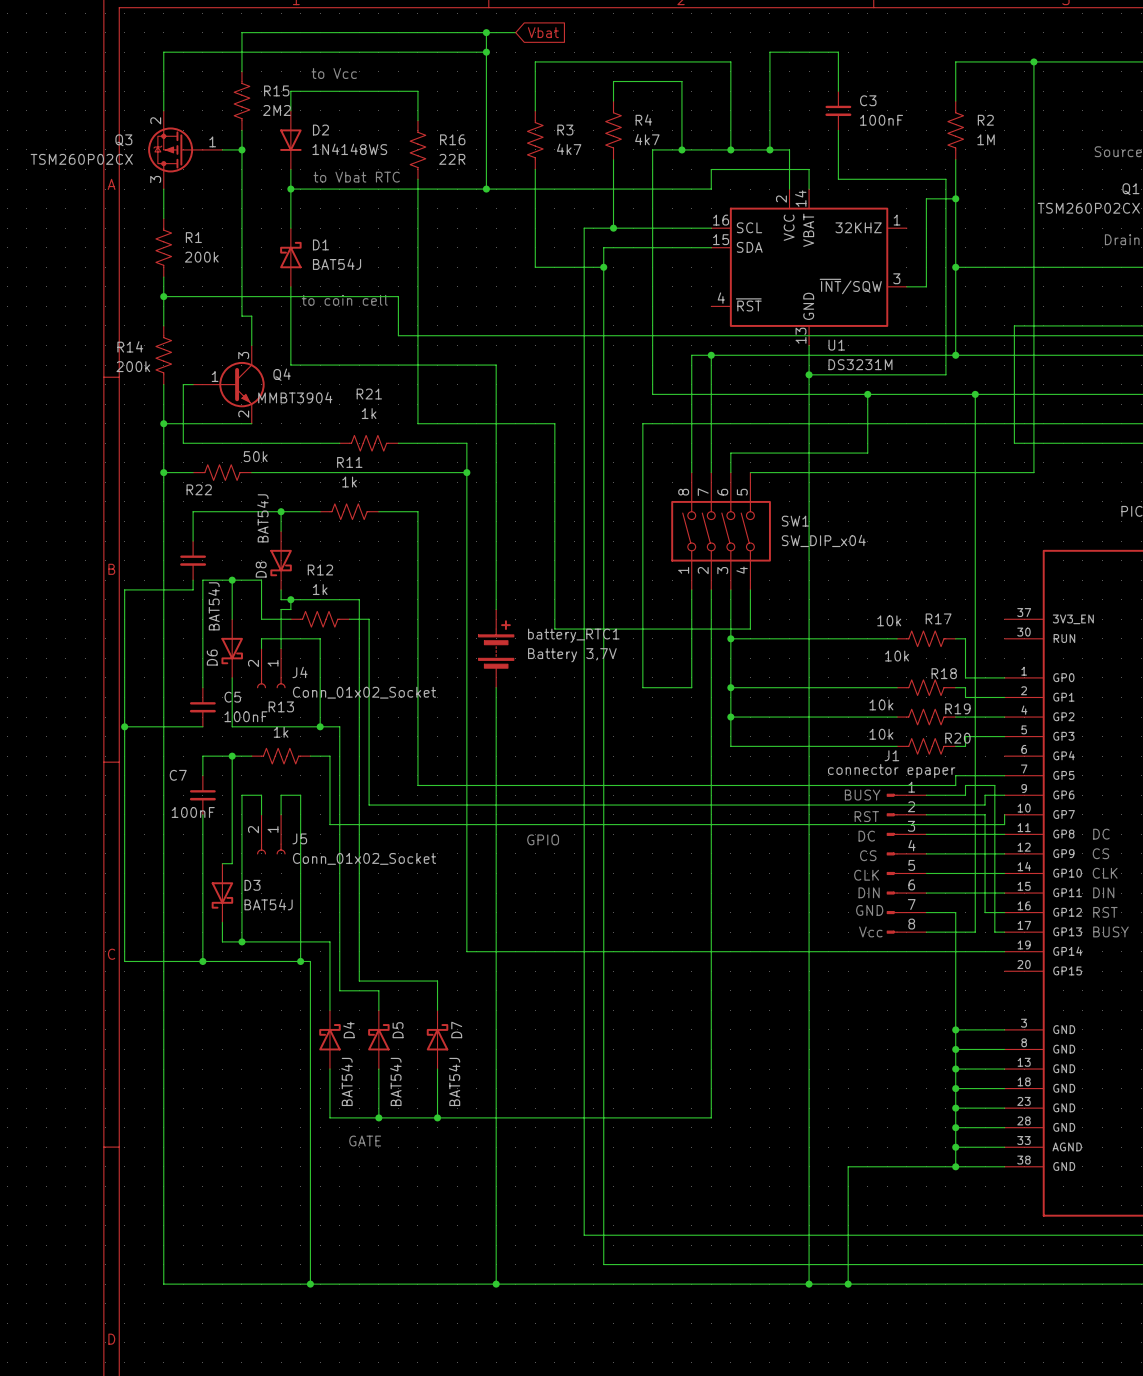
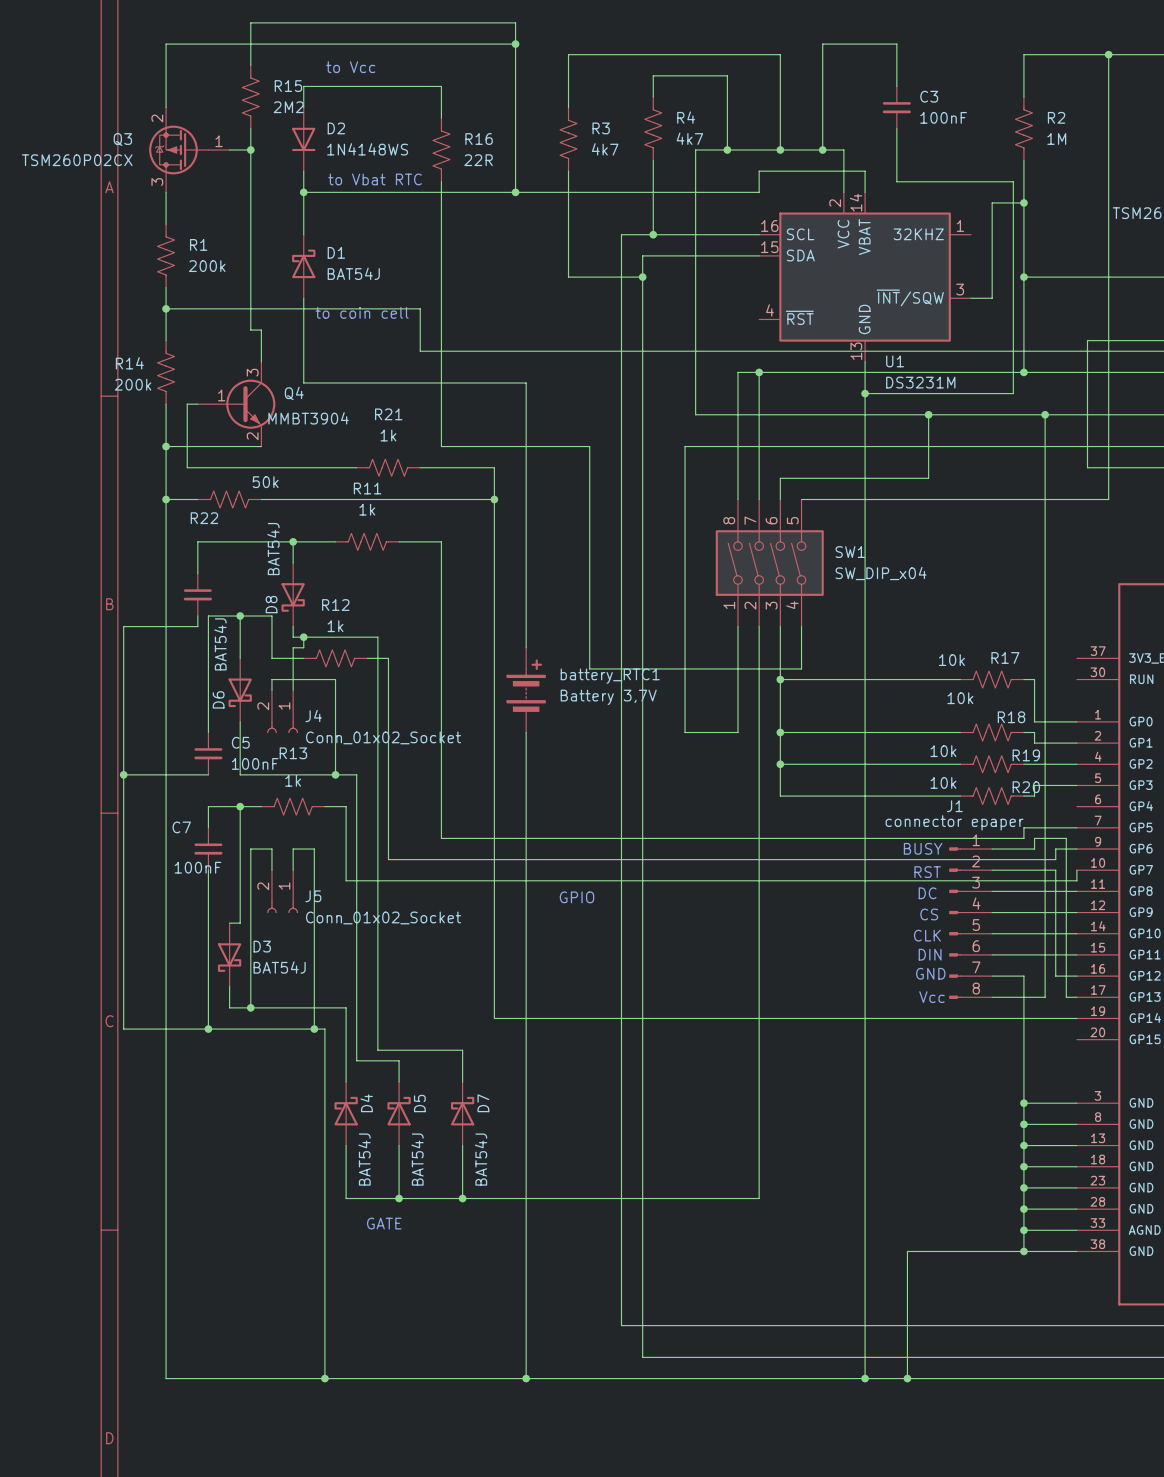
wire: (486, 32) (515, 32) -> none
junction: (486, 32) -> none
global label: Vbat (543, 32) -> none

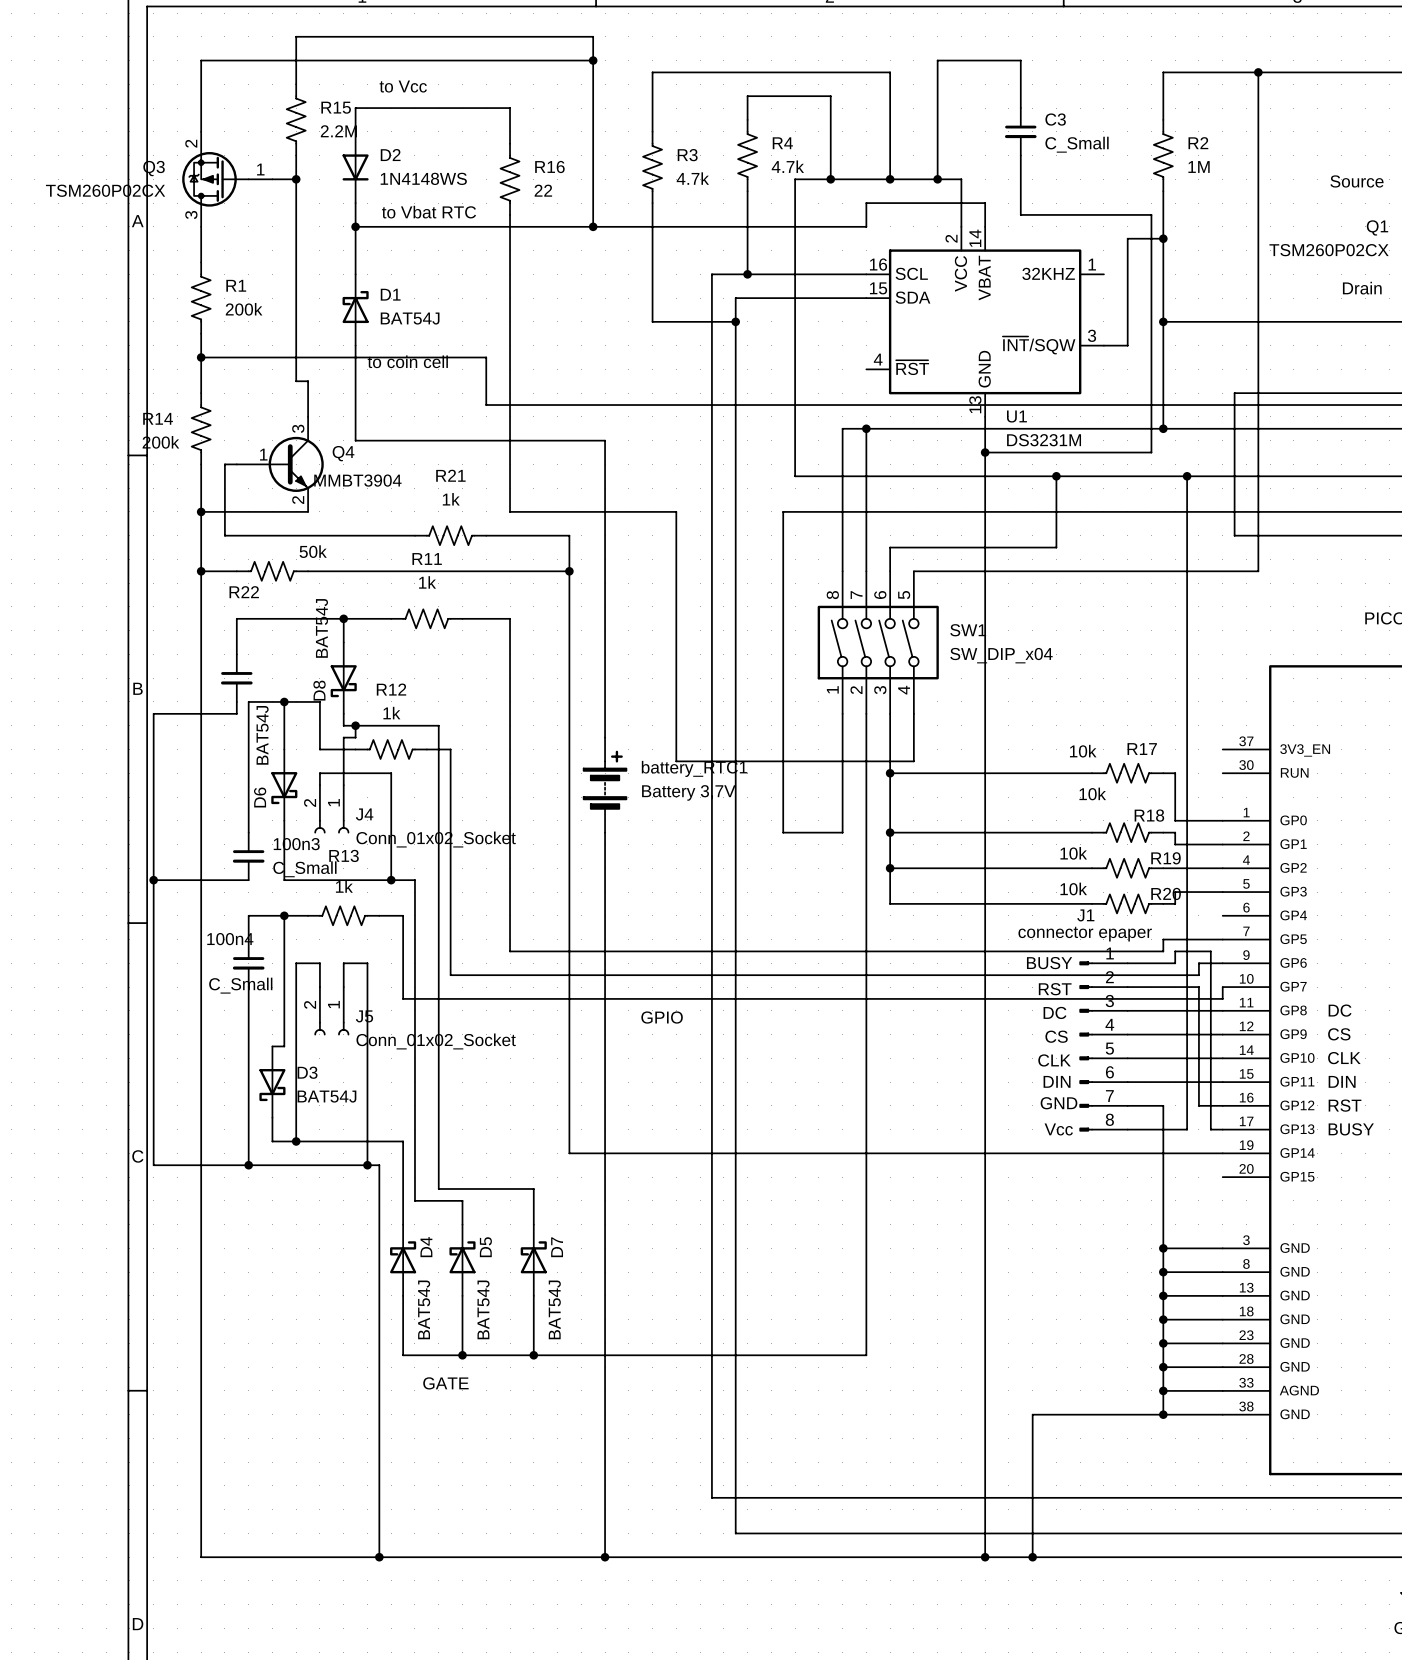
R15 value: 2M2 (288, 107) -> 2.2M (338, 131)
C3 value: 100nF (943, 117) -> C_Small (1077, 144)
R4 value: 4k7 (689, 138) -> 4.7k (787, 166)
R3 value: 4k7 (605, 149) -> 4.7k (692, 178)
R16 value: 22R (478, 160) -> 22 (543, 190)
C5 name: C5 (240, 742) -> 100n3 (296, 844)
C5 value: 100nF (255, 763) -> C_Small (304, 869)
C7 name: C7 (181, 827) -> 100n4 (230, 939)
C7 value: 100nF (197, 867) -> C_Small (240, 985)

